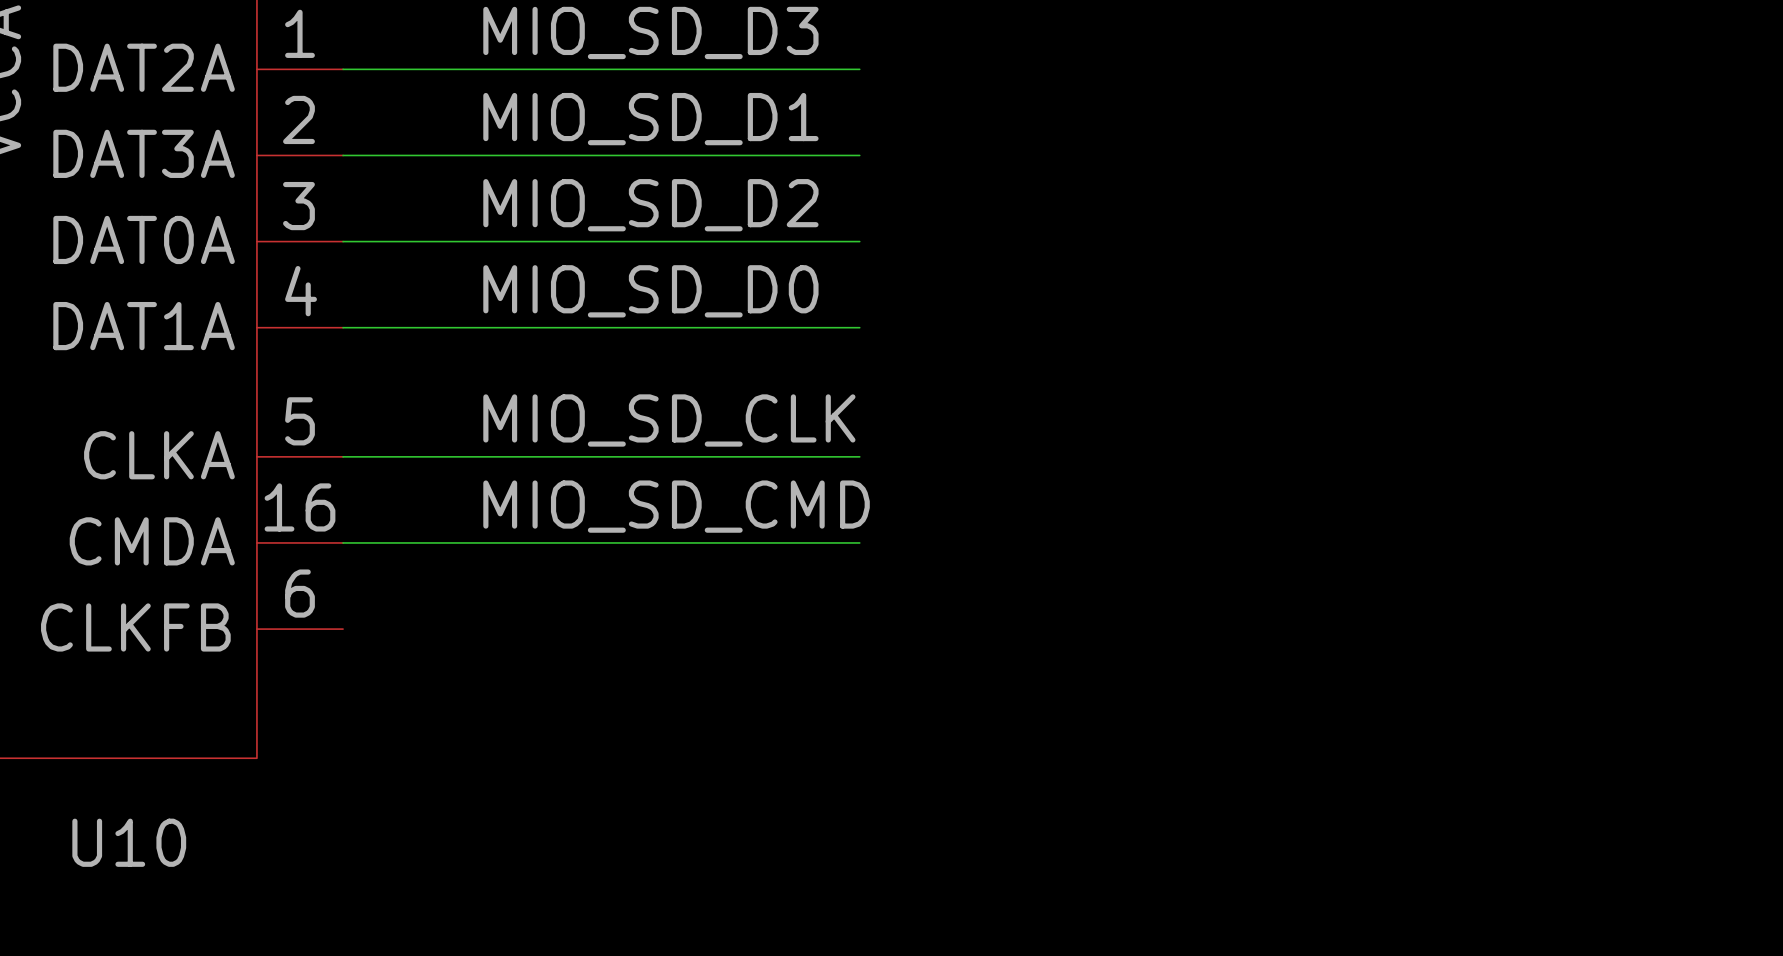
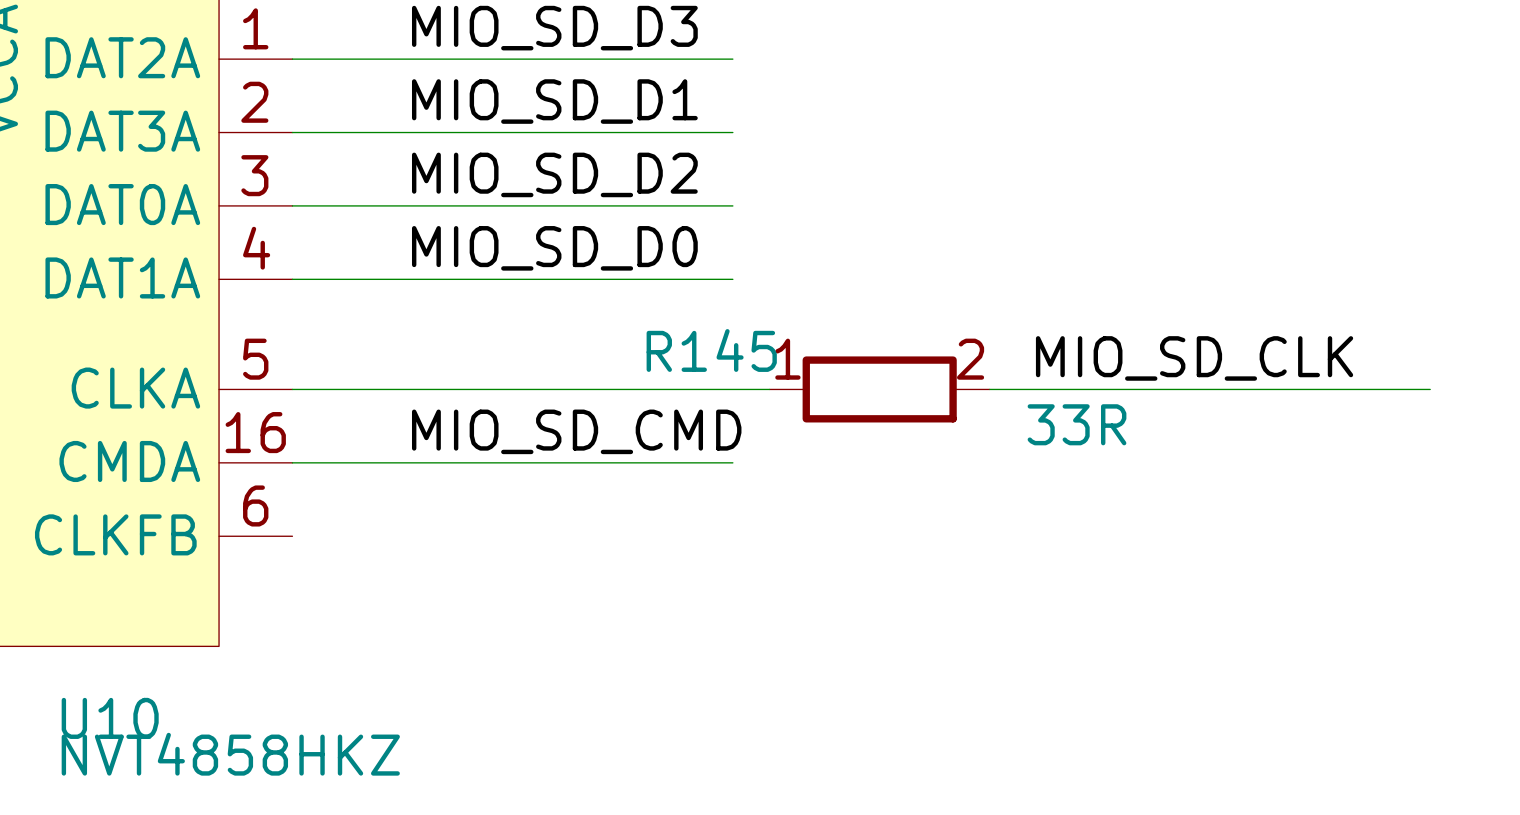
label position: MIO_SD_CLK (669, 420) -> MIO_SD_CLK (1194, 358)
wire: none -> (732, 389) (769, 389)
R145: none -> 33R (879, 389)
wire: none -> (989, 389) (1430, 389)
U10 value: none -> NVT4858HKZ (230, 754)

